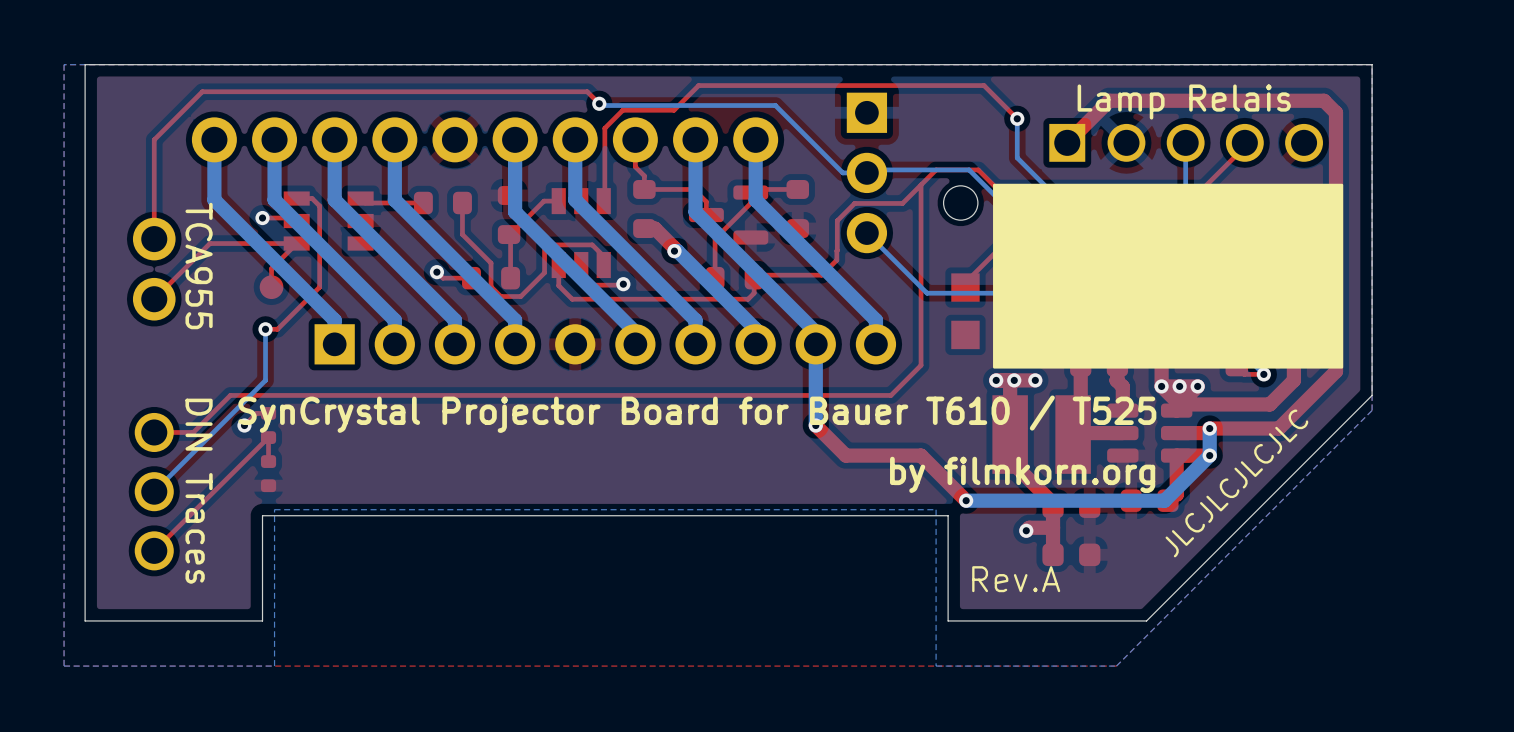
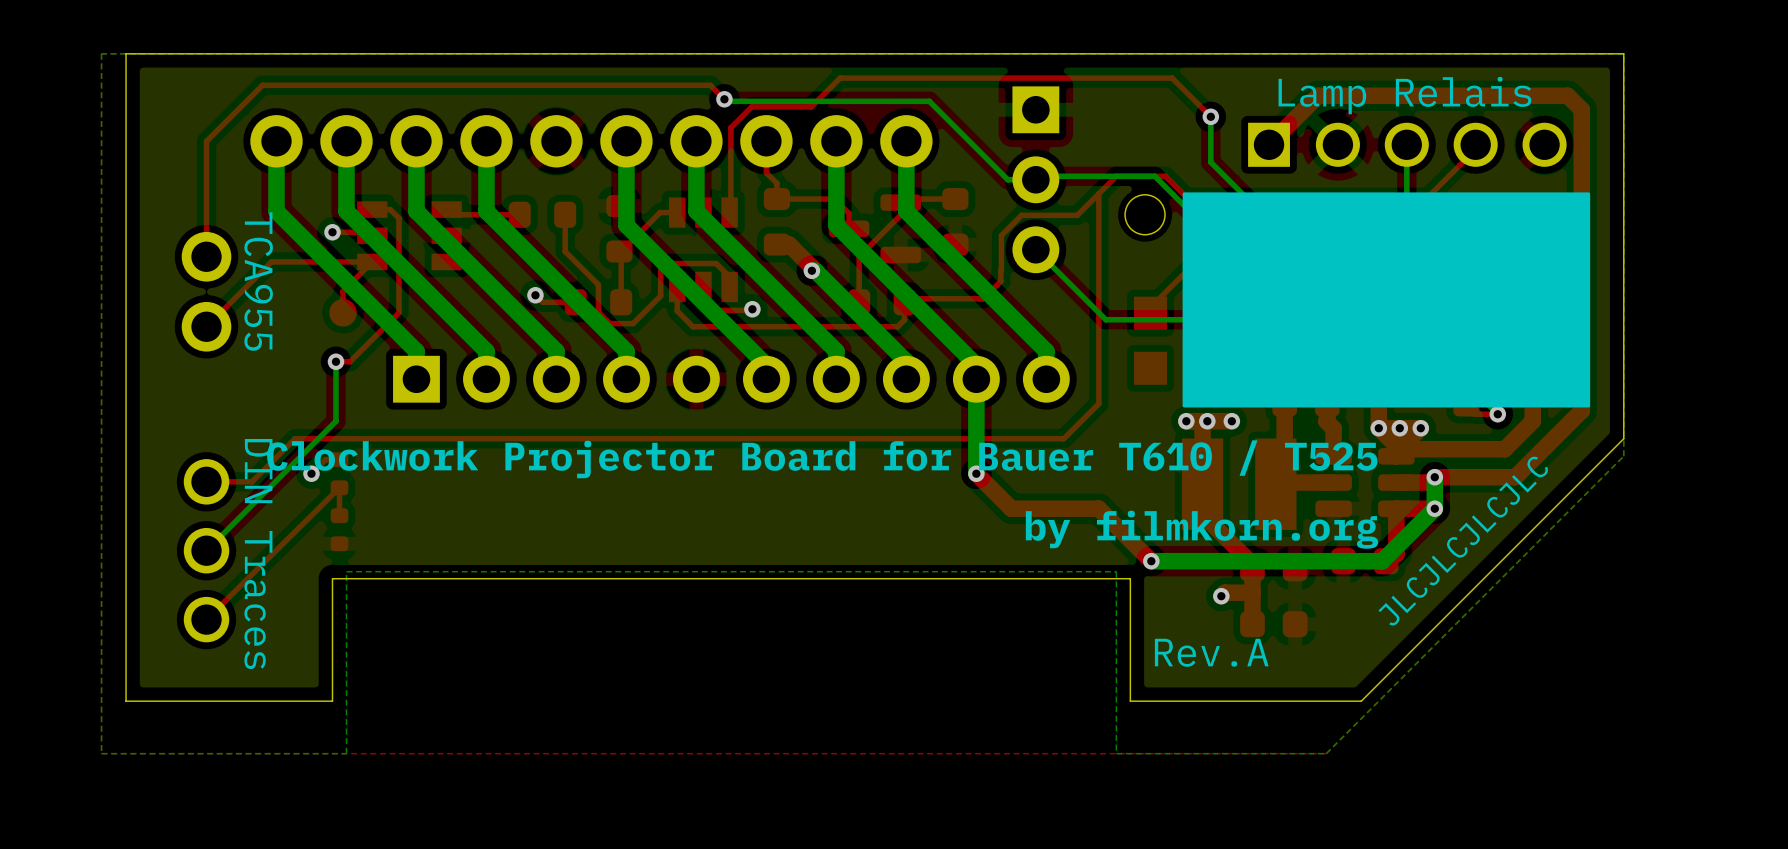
text: SynCrystal Projector Board for Bauer T610 / T525 (697, 414) -> Clockwork Projector Board for Bauer T610 / T525 (822, 459)

